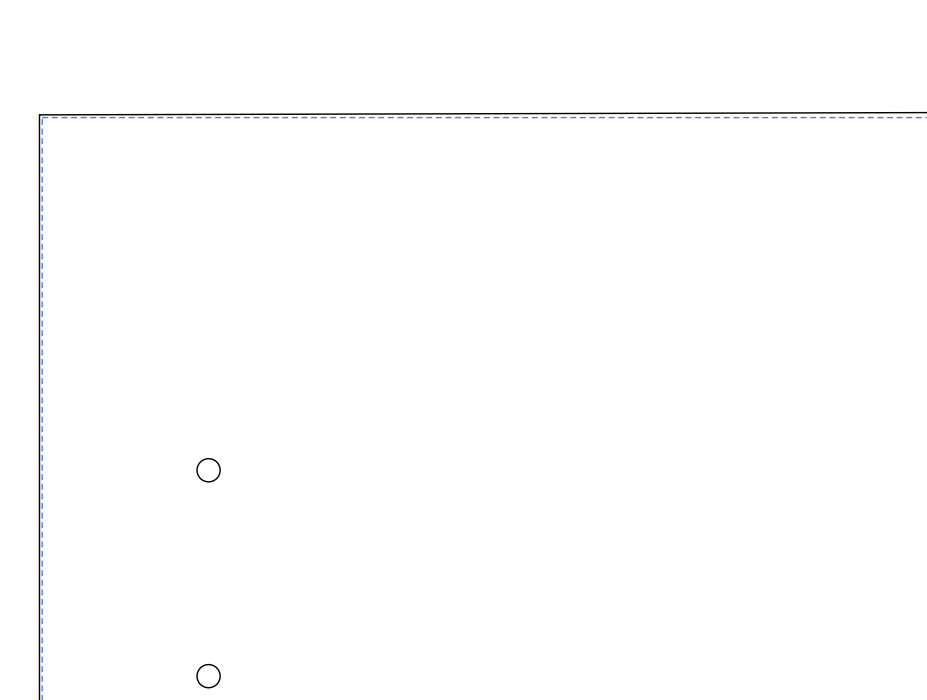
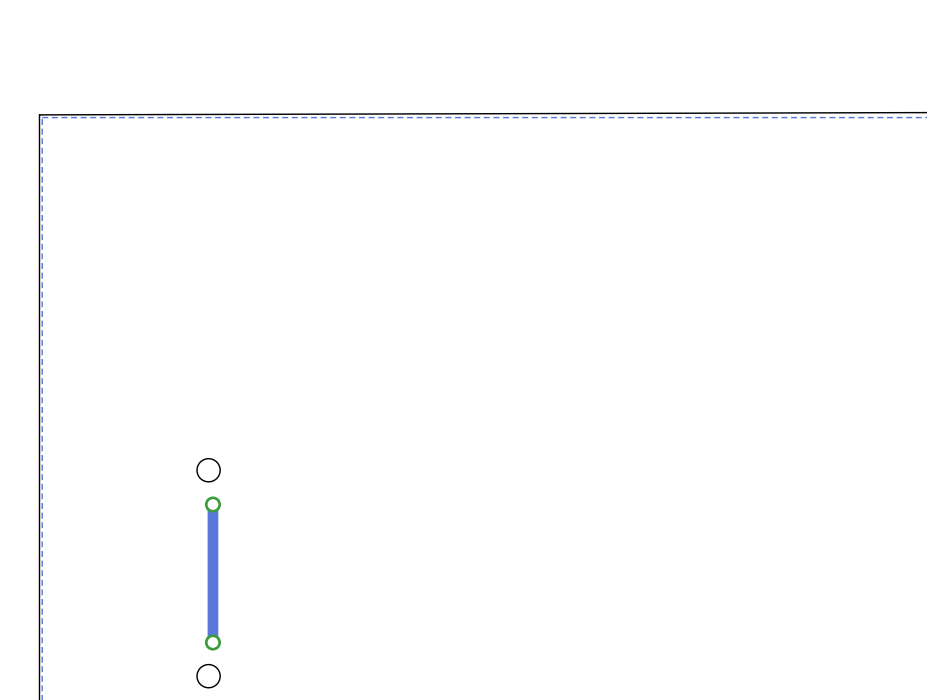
track: none -> (212, 504) (212, 642)
via: none -> (212, 504)
via: none -> (212, 642)

